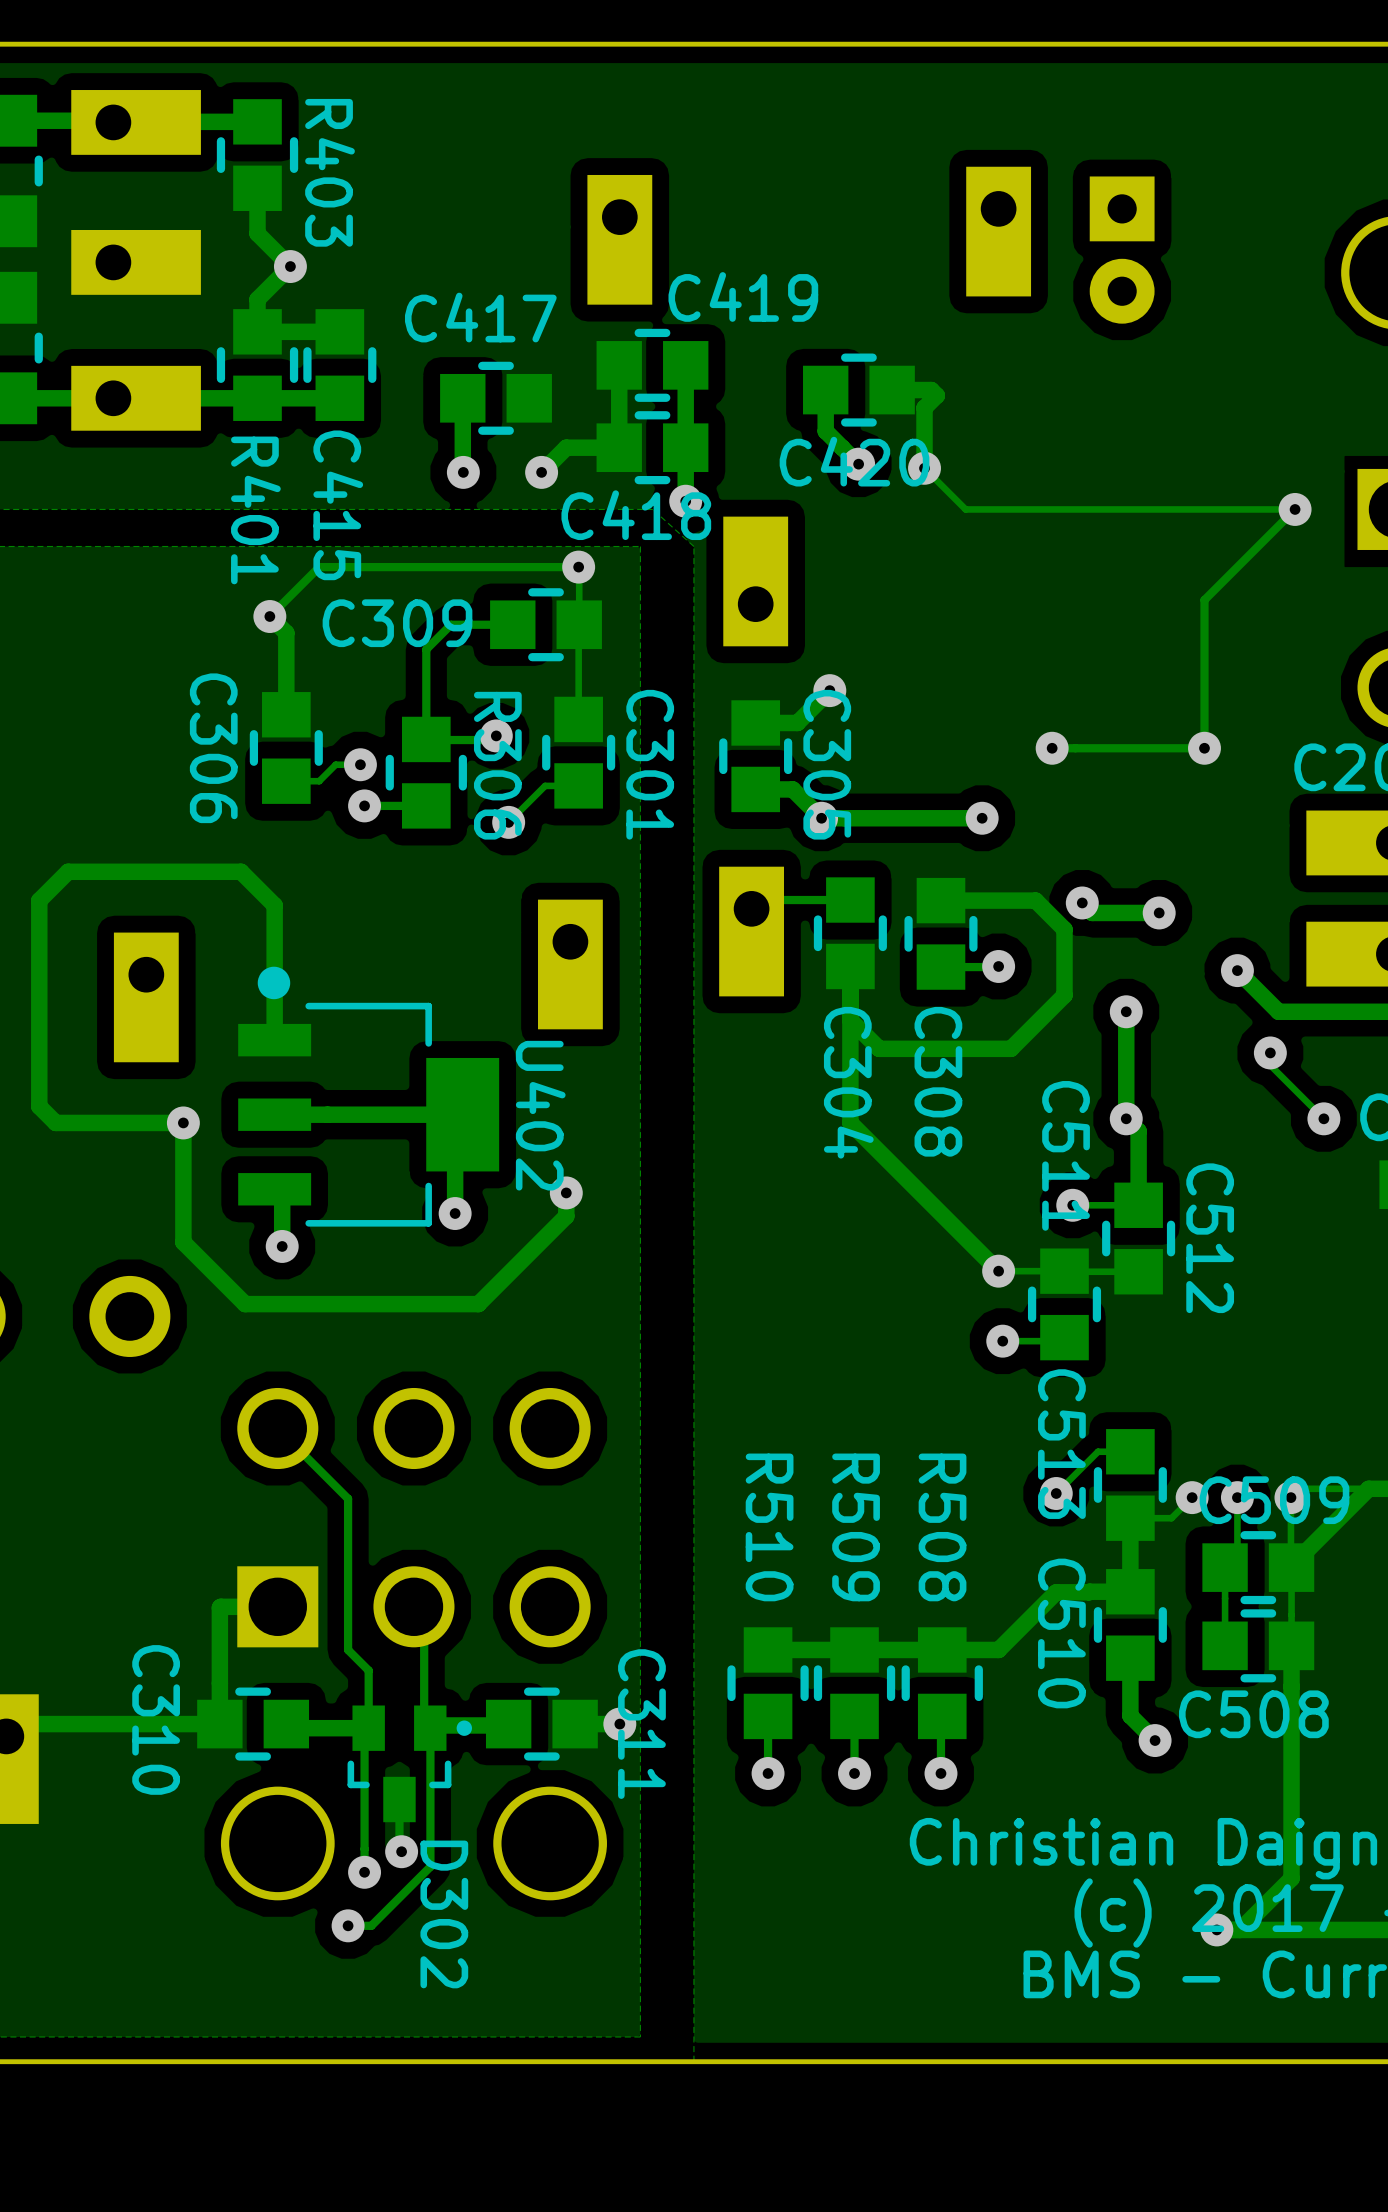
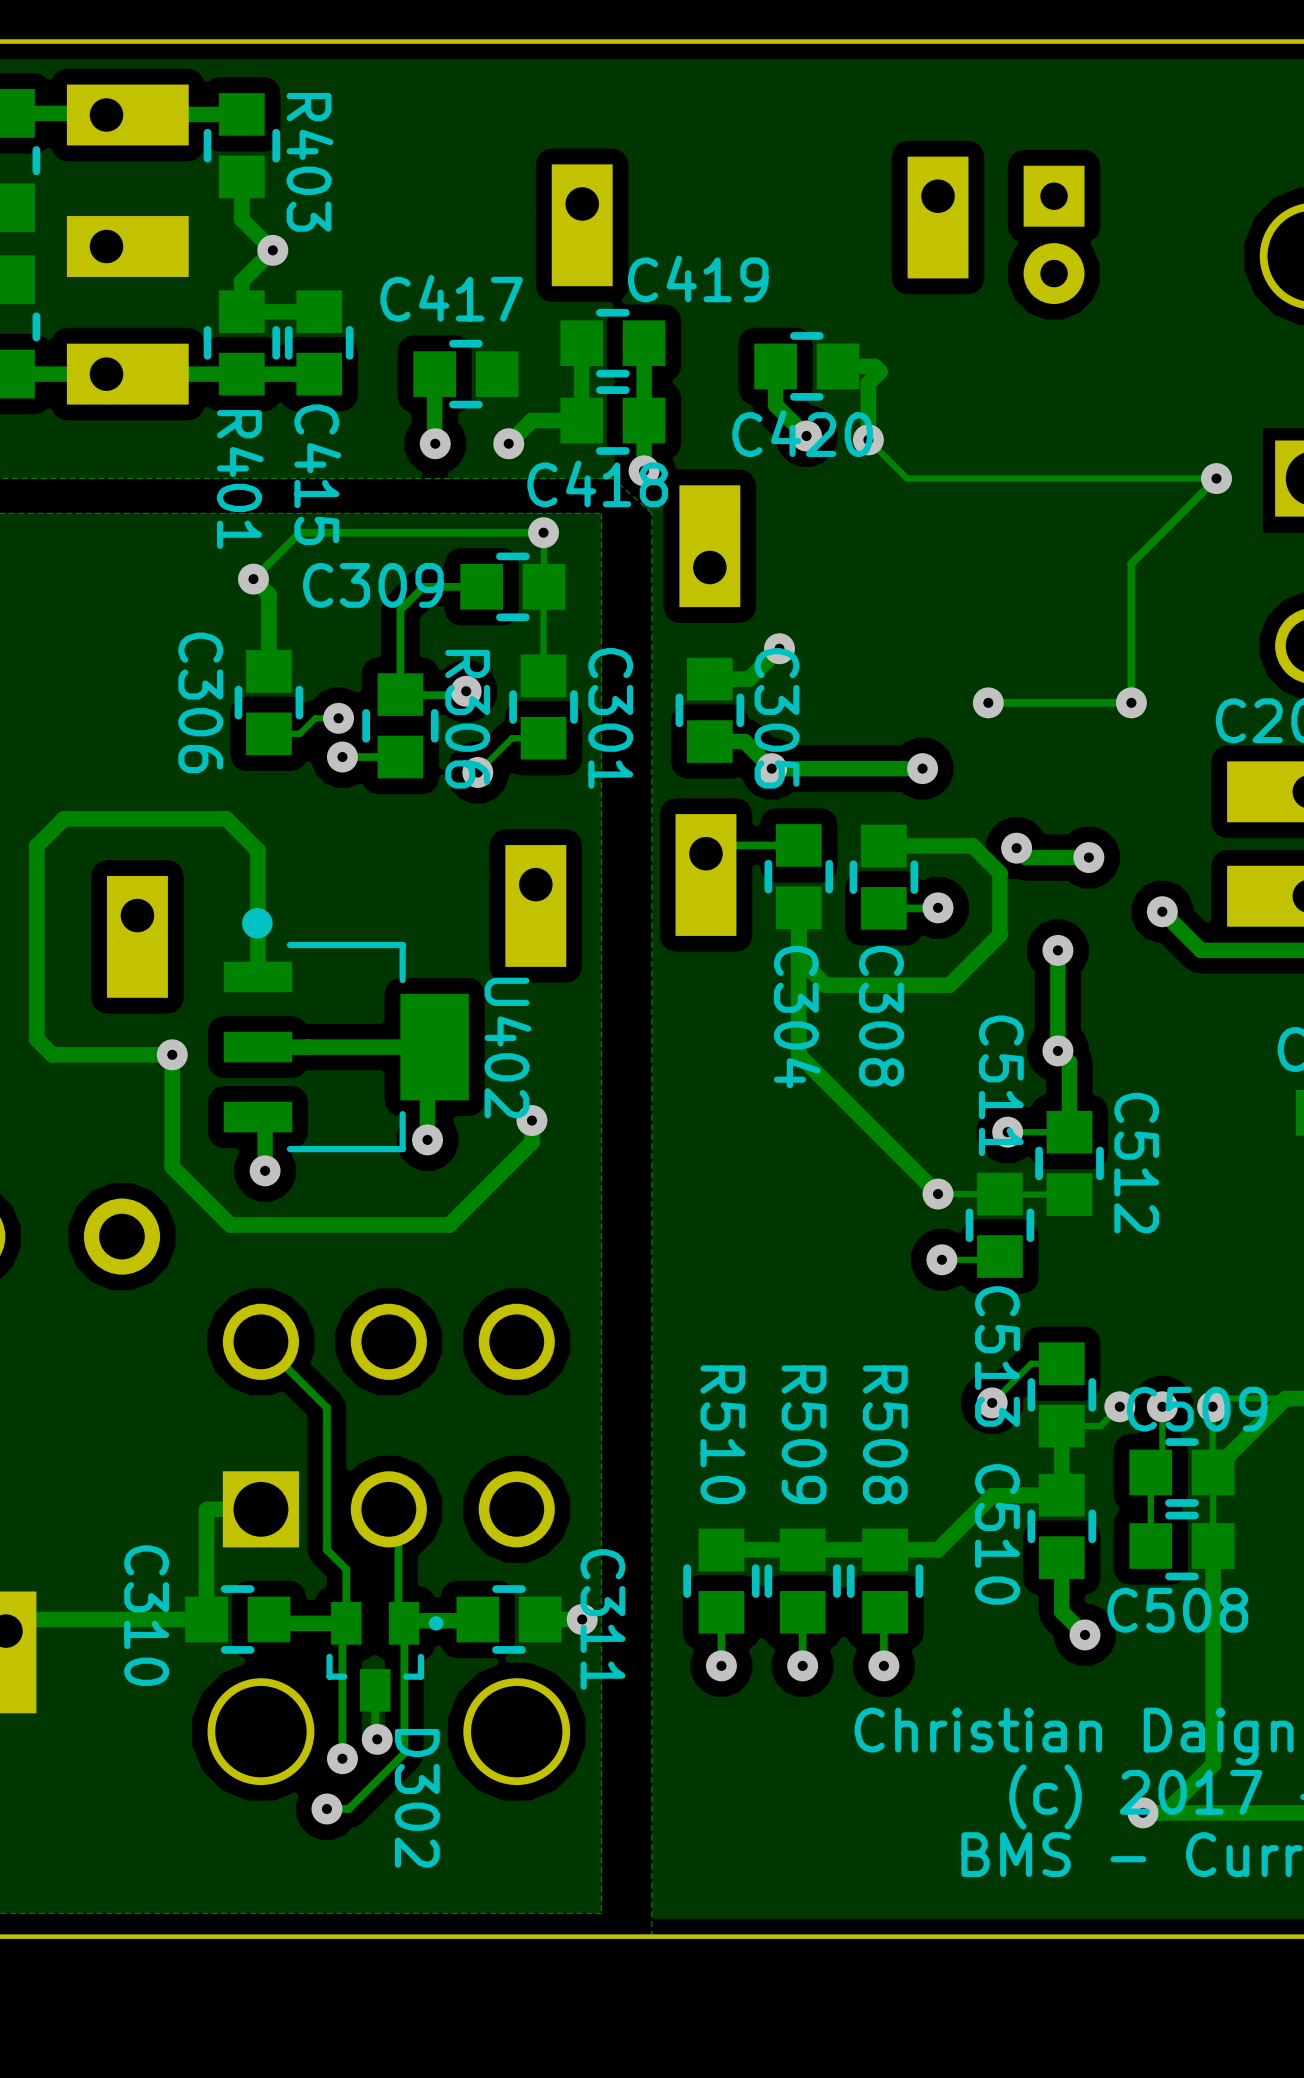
track: (1270, 1052) (1270, 1065) (1323, 1118) -> none
via: (1270, 1052) -> none
via: (1323, 1118) -> none

